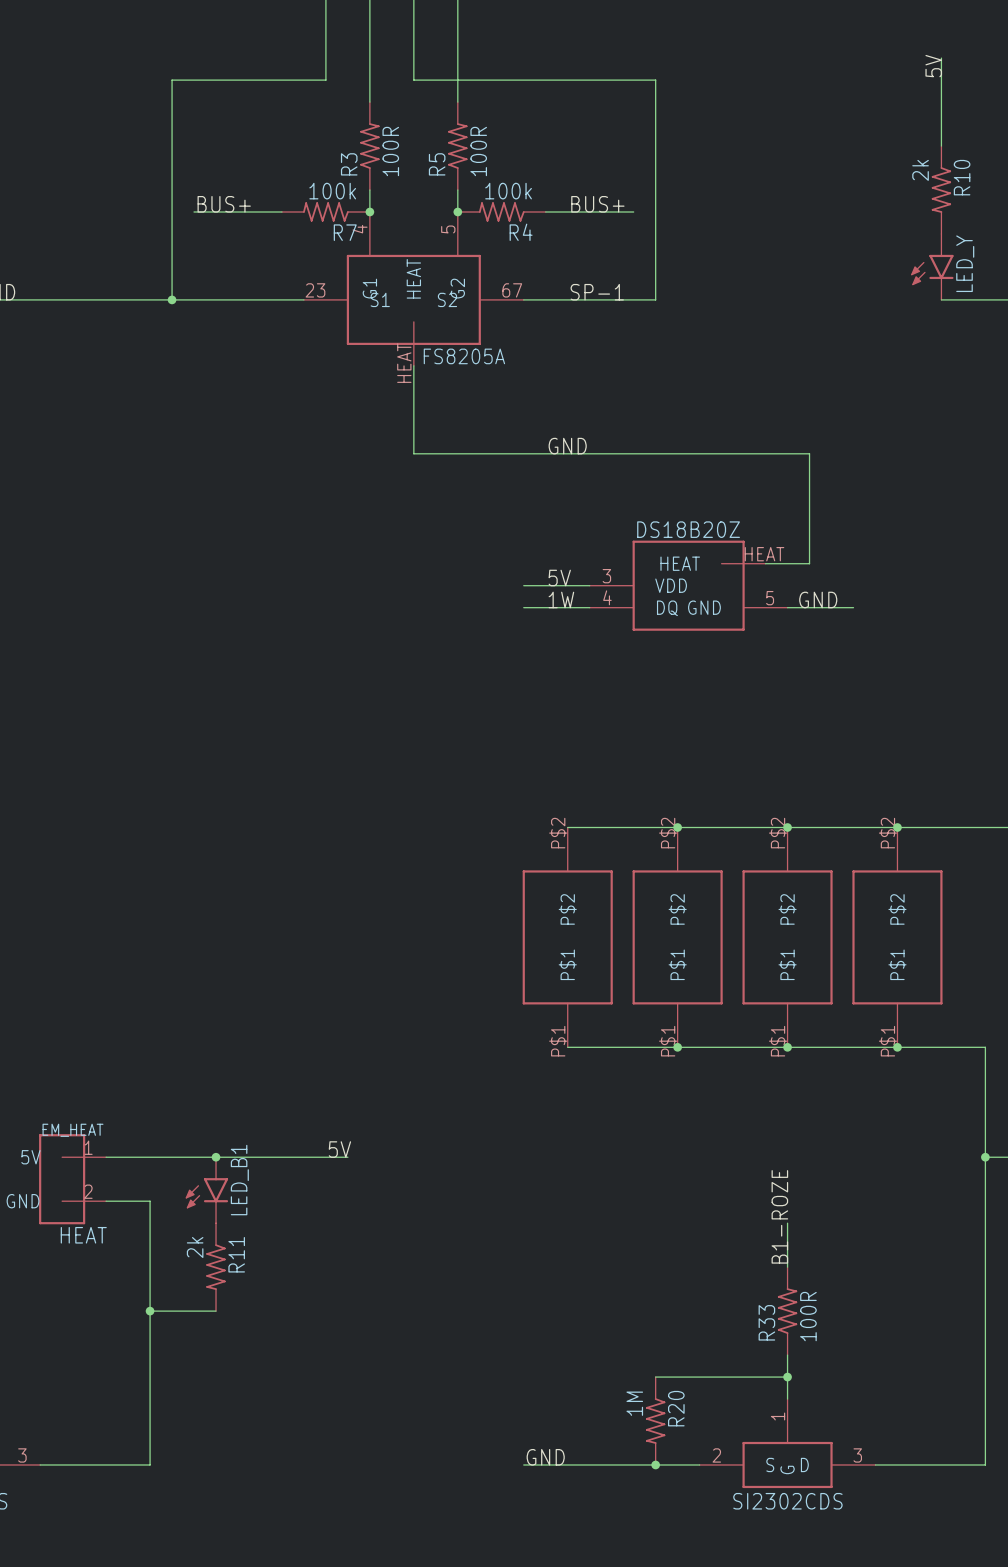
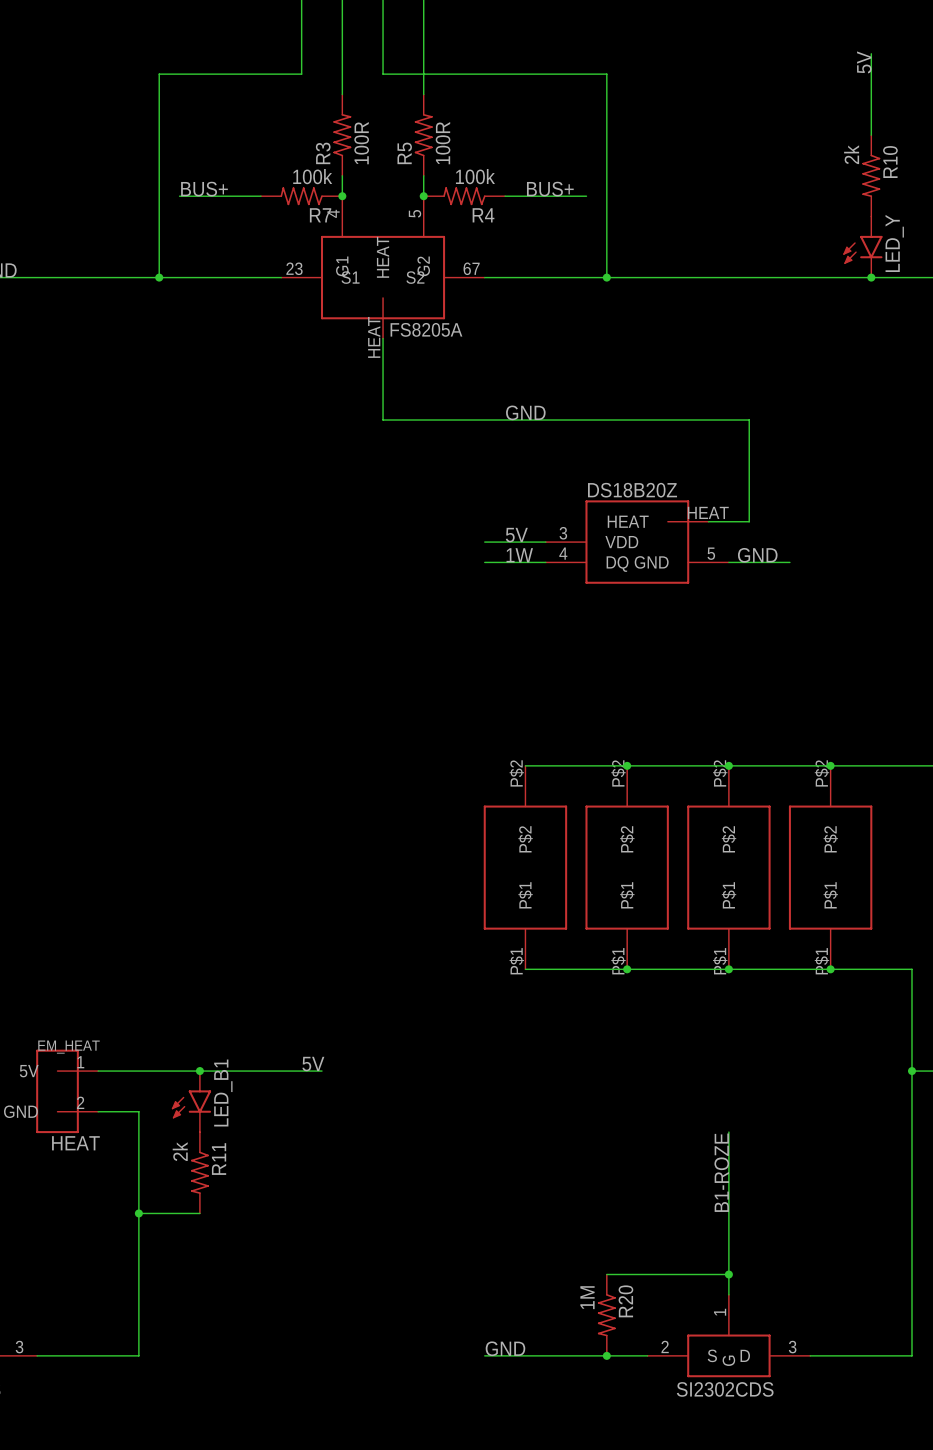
label: SP-1 (597, 292) -> none
wire: none -> (606, 277) (871, 277)
junction: none -> (606, 277)
junction: none -> (871, 277)
label position: B1-ROZE (779, 1216) -> B1-ROZE (721, 1172)
R33: 100R (787, 1311) -> none

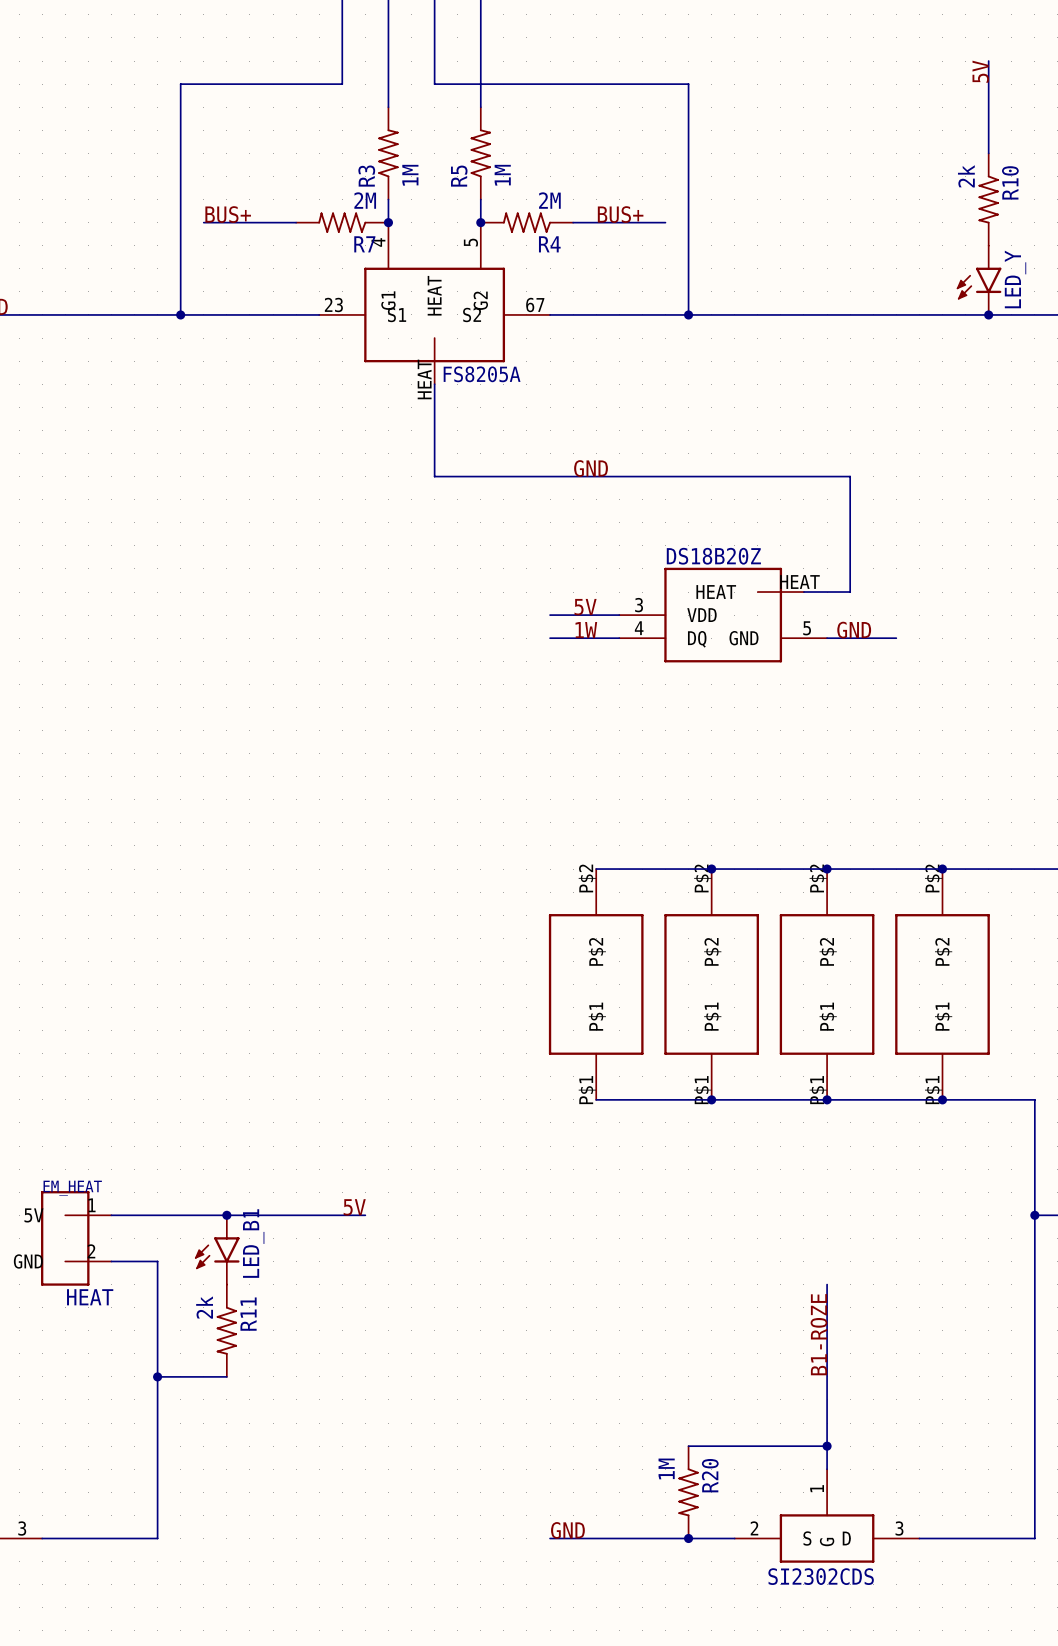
R3 value: 100R (361, 143) -> 1M (410, 175)
R5 value: 100R (443, 143) -> 1M (502, 175)
R7 value: 100k (312, 176) -> 2M (365, 200)
R4 value: 100k (475, 176) -> 2M (549, 200)

